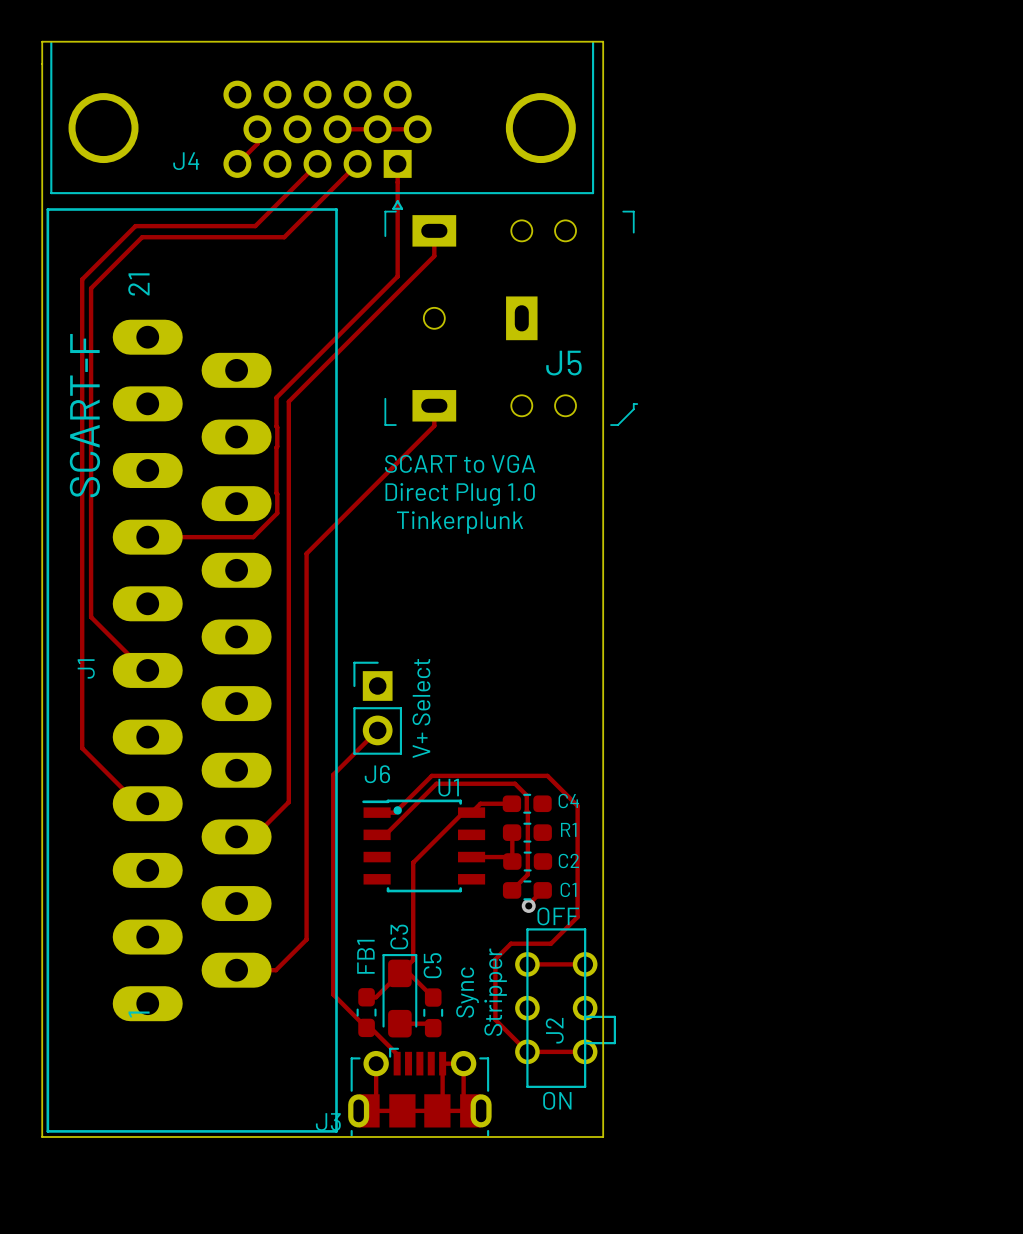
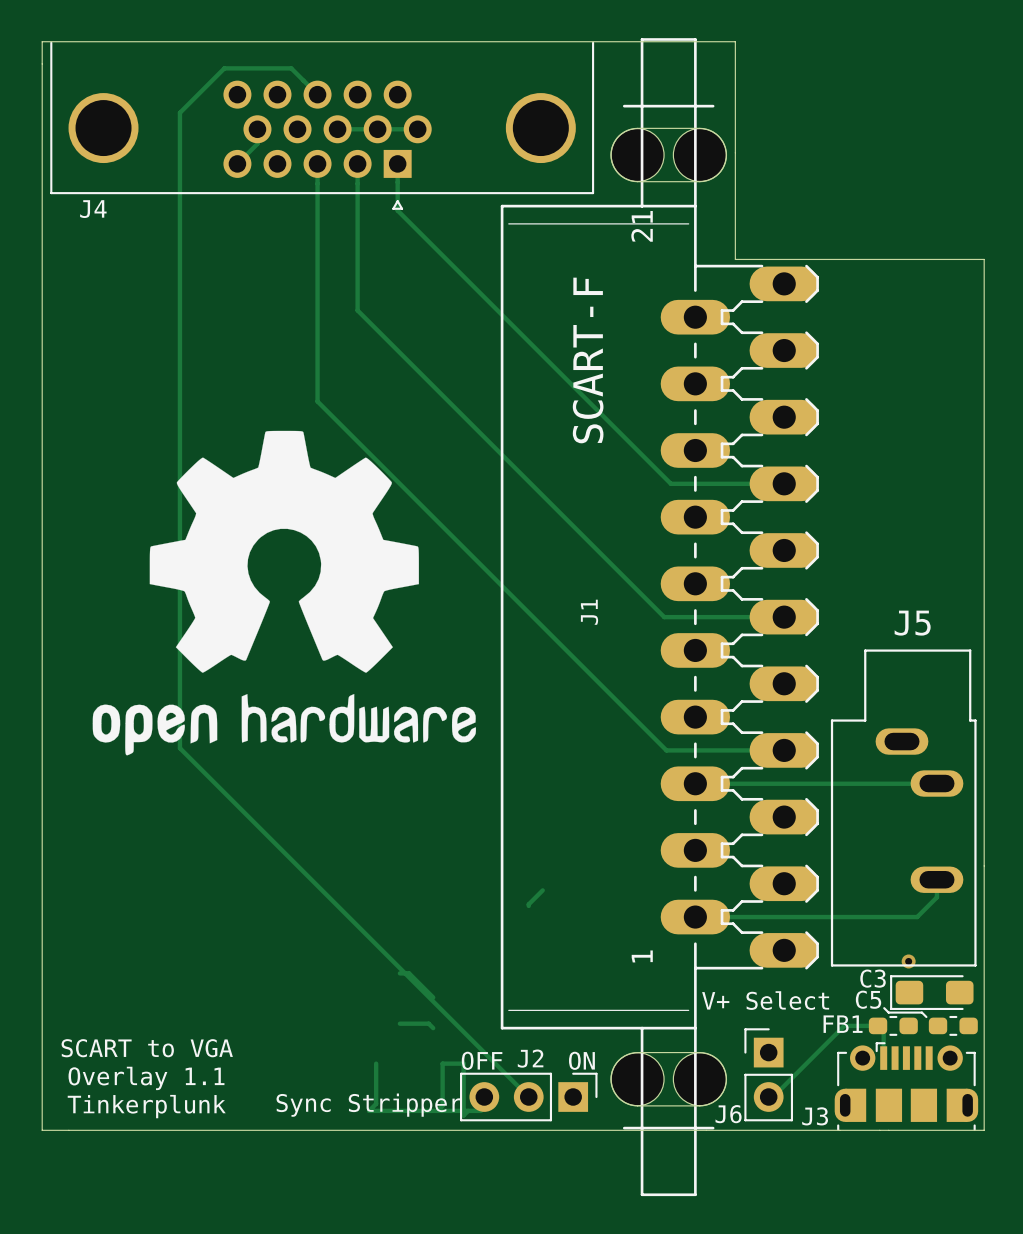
board edge: (603, 41) (603, 1136) (42, 1136) (42, 1130) -> (603, 41) (735, 41) (735, 259) (984, 259) (984, 1130) (42, 1130)
track: none -> (317, 94) (291, 68) (224, 68) (179, 112) (179, 748) (528, 1097)
J4 name position: J4 (186, 161) -> J4 (93, 209)
track: (317, 163) (255, 226) (135, 226) (82, 279) (82, 748) (137, 803) (147, 803) -> (317, 163) (317, 401) (666, 750) (784, 750)
track: (357, 163) (284, 237) (142, 237) (91, 288) (91, 617) (144, 670) (147, 670) -> (357, 163) (357, 310) (664, 617) (784, 617)
J1 footprint: [46, 208, 338, 1133] -> [500, 38, 819, 1197]
J5 footprint: [384, 210, 639, 426] -> [830, 649, 977, 967]
track: (397, 210) (397, 276) (276, 397) (277, 513) (253, 537) (147, 537) -> (397, 210) (670, 483) (784, 483)
track: (434, 230) (434, 256) (288, 401) (288, 802) (254, 836) (236, 836) -> none
J5 name position: J5 (563, 363) -> J5 (912, 623)
track: (434, 405) (434, 425) (306, 553) (306, 939) (275, 970) (236, 970) -> none
drawing: none -> [92, 430, 476, 756]
text: SCART to VGA (460, 463) -> none
text: Direct Plug 1.0 (460, 494) -> none
text: Tinkerplunk (460, 522) -> none
J1 name position: J1 (86, 668) -> J1 (589, 612)
J6 position: (377, 708) -> (768, 1074)
J6 value rotation: 0° (421, 708) -> 90° clockwise (765, 1000)
track: (377, 730) (333, 774) (333, 994) (366, 1027) (370, 1027) (397, 1054) (397, 1063) -> none
J6 name position: J6 (377, 774) -> J6 (728, 1114)
track: none -> (695, 783) (936, 783)
track: (511, 803) (480, 803) (471, 812) (463, 812) (413, 862) (413, 960) (376, 997) (366, 997) -> none
C4: (527, 803) -> none
track: (377, 812) (395, 812) (431, 775) (547, 775) (577, 805) (577, 917) (550, 943) (510, 943) (495, 959) (495, 1019) (527, 1051) (585, 1051) -> none
track: (512, 832) (512, 861) (507, 857) (471, 857) -> none
R1: (527, 832) -> none
track: (377, 834) (385, 834) (436, 783) (515, 783) (526, 795) (527, 874) (512, 890) -> none
U1: (423, 845) -> none
C2: (527, 861) -> none
track: none -> (936, 879) (936, 897) (917, 917) (695, 917)
C1: (527, 890) -> none
via: (528, 905) -> none
text position: OFF (558, 916) -> OFF (482, 1060)
J2 footprint: [515, 928, 617, 1088] -> [460, 1072, 598, 1122]
FB1 name position: FB1 (365, 956) -> FB1 (843, 1024)
via: none -> (908, 961)
track: (527, 964) (585, 964) -> none
C5 name position: C5 (432, 965) -> C5 (868, 999)
text: Sync (467, 992) -> none
text: Stripper (495, 992) -> none
C3 rotation: 0° (399, 995) -> 90° counterclockwise (931, 992)
C3 position: (399, 995) -> (931, 992)
line: none -> (884, 1008) (888, 1012) (921, 1012) (926, 1017)
FB1 rotation: 0° (366, 1012) -> 90° clockwise (893, 1025)
FB1 position: (366, 1012) -> (893, 1025)
C5 rotation: 0° (433, 1012) -> 90° clockwise (953, 1025)
C5 position: (433, 1012) -> (953, 1025)
J2 name position: J2 (554, 1030) -> J2 (530, 1058)
text: none -> SCART to VGA (147, 1048)
track: none -> (883, 1058) (883, 1031) (878, 1025) (844, 1025) (773, 1097) (768, 1097)
text: none -> Overlay 1.1 (146, 1078)
J3 position: (419, 1092) -> (906, 1086)
text position: ON (557, 1100) -> ON (581, 1060)
text: none -> Sync Stripper (369, 1105)
text: none -> Tinkerplunk (146, 1106)

